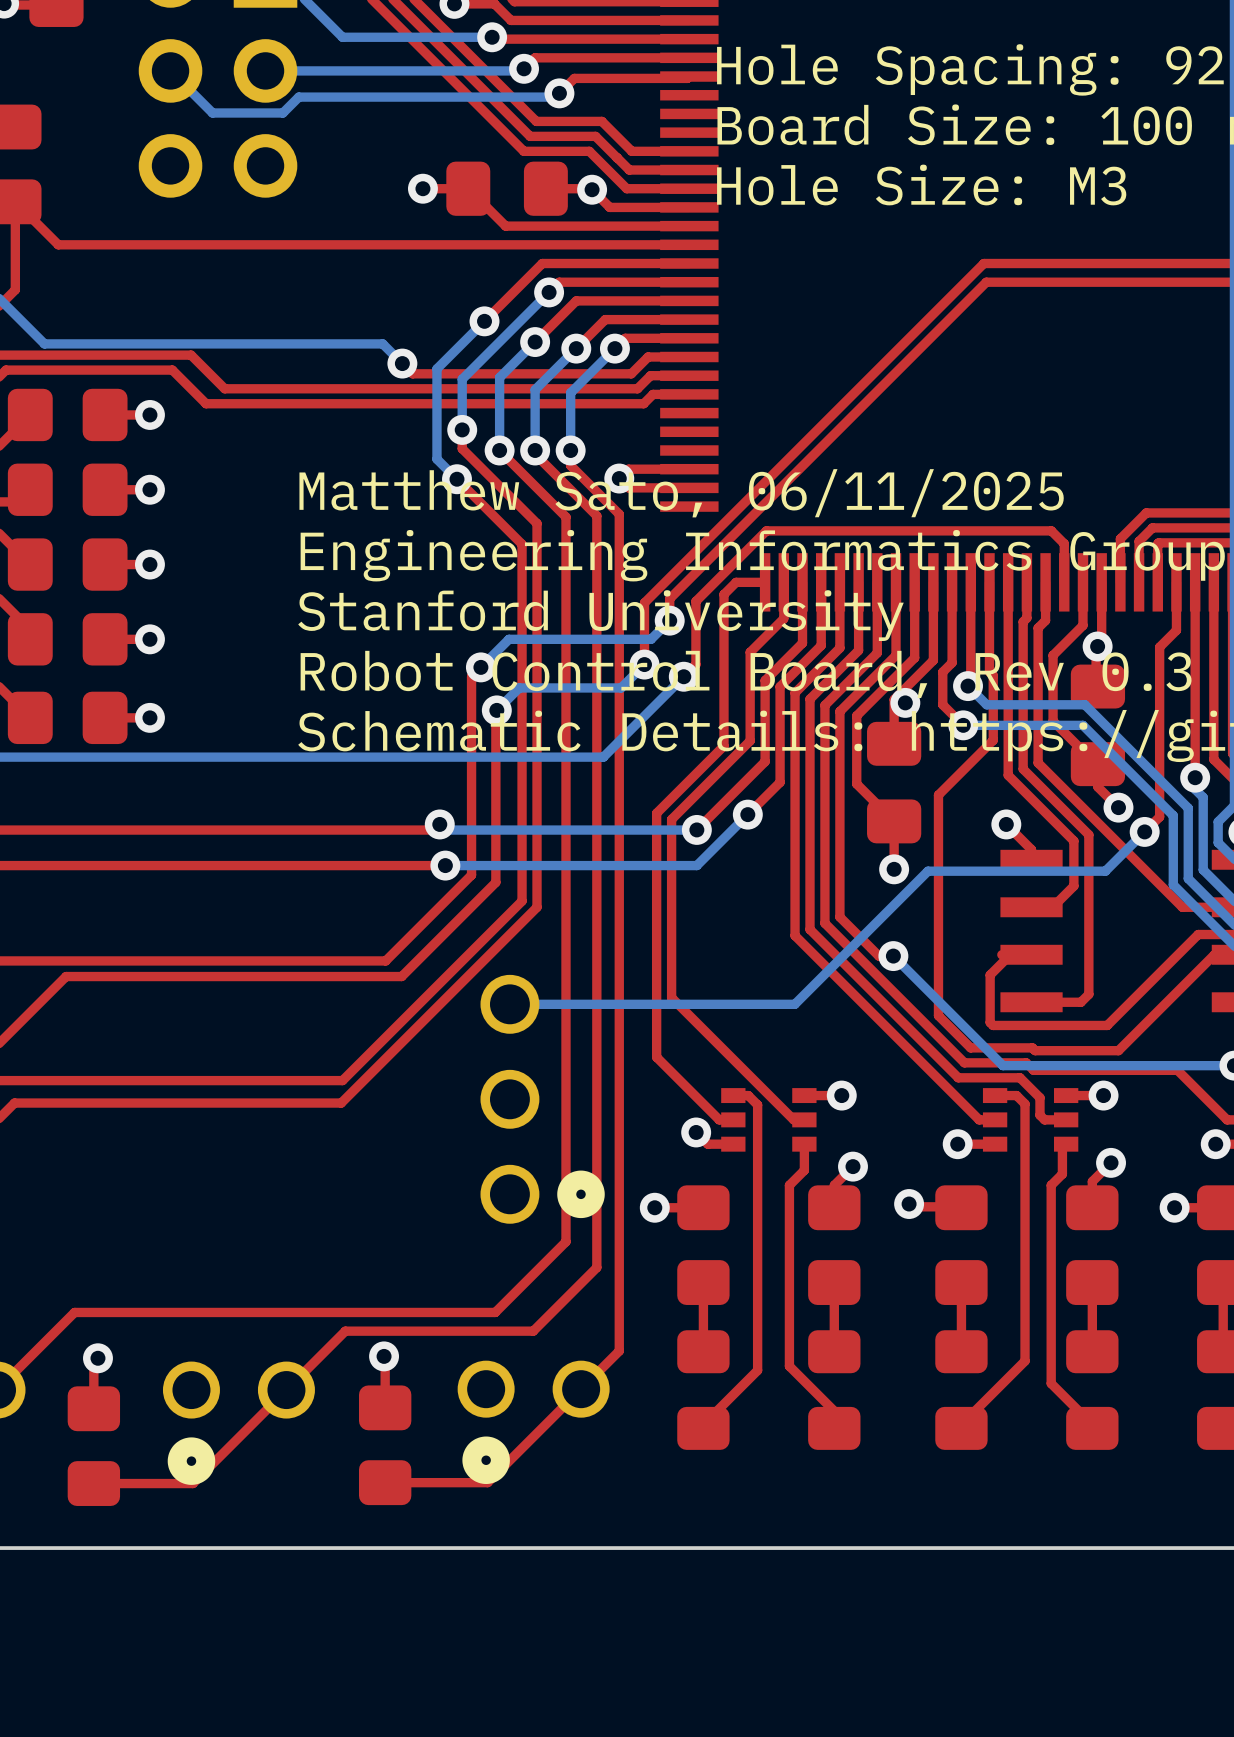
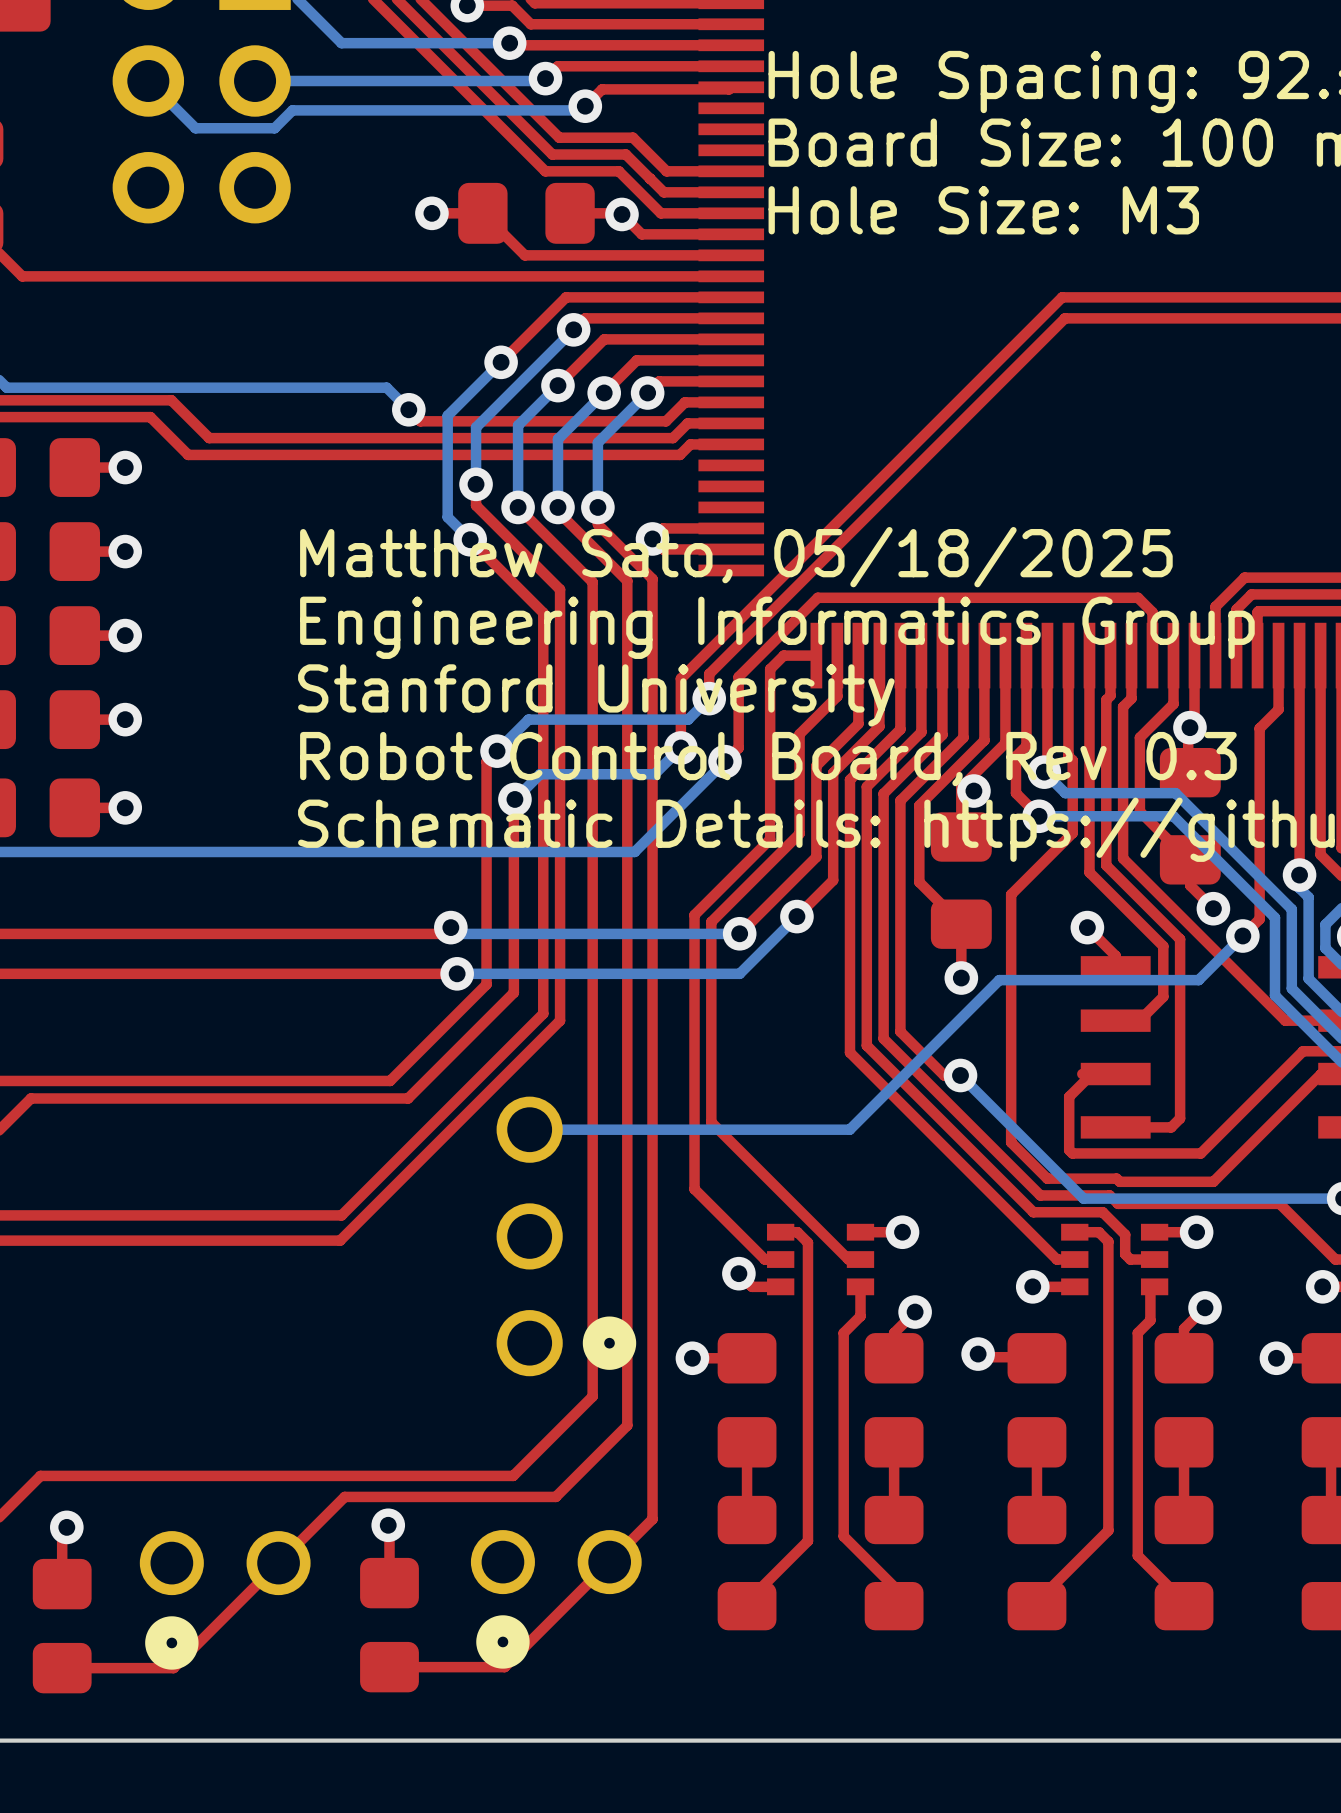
text: Matthew Sato, 06/11/2025 (681, 493) -> Matthew Sato, 05/18/2025 (736, 557)

